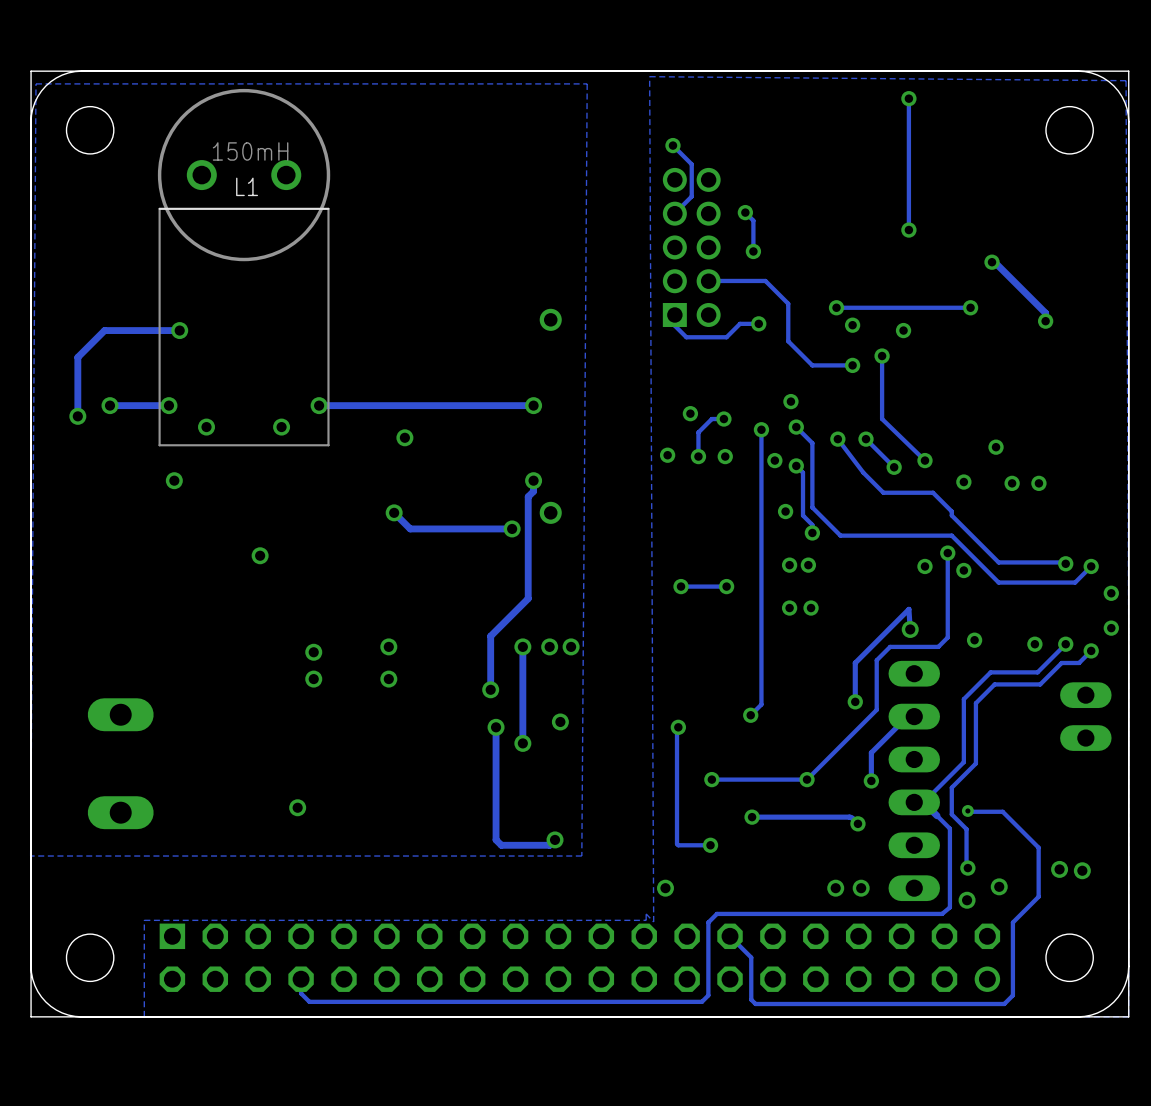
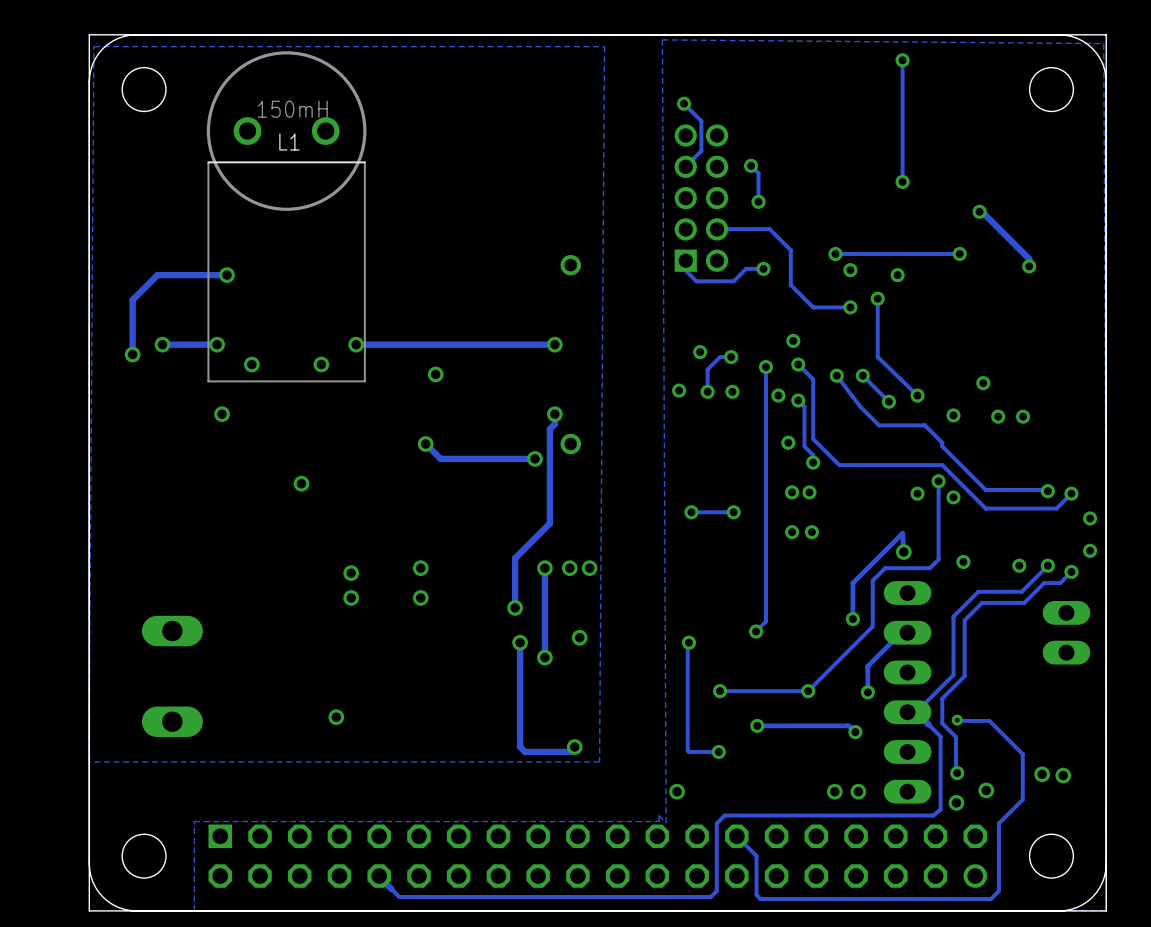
track: (301, 979) (301, 993) (309, 1001) (365, 1001) -> (379, 876) (399, 897)

